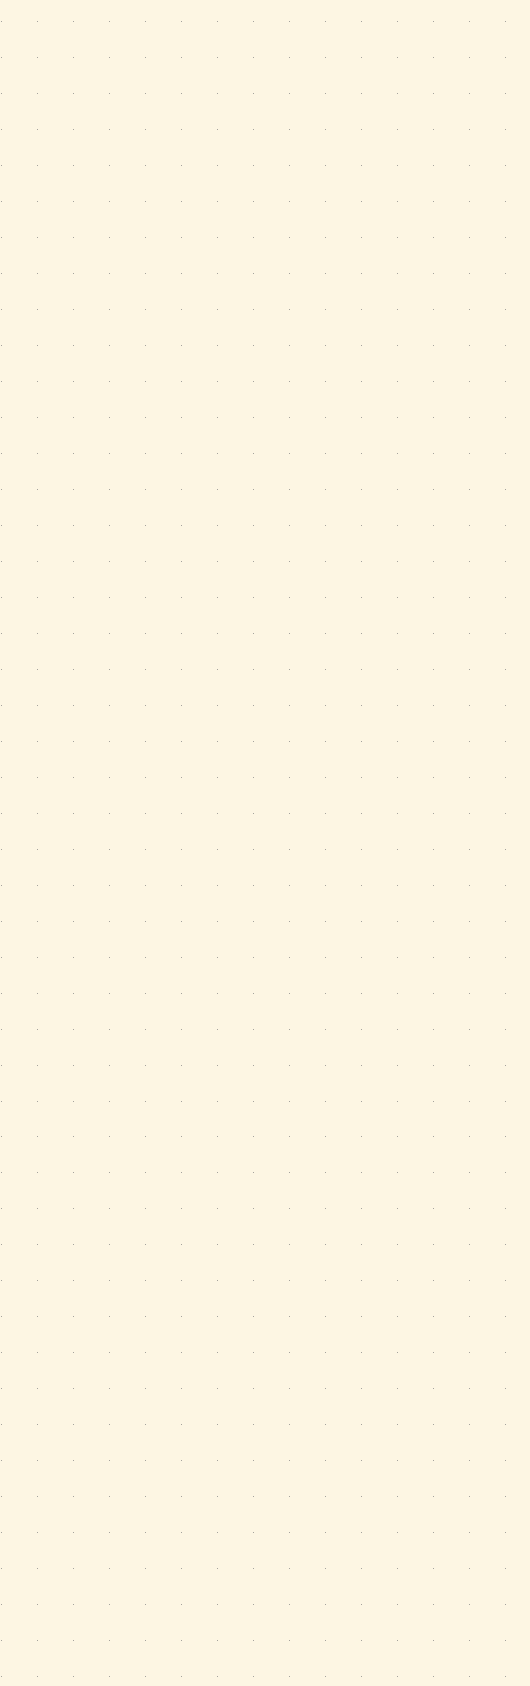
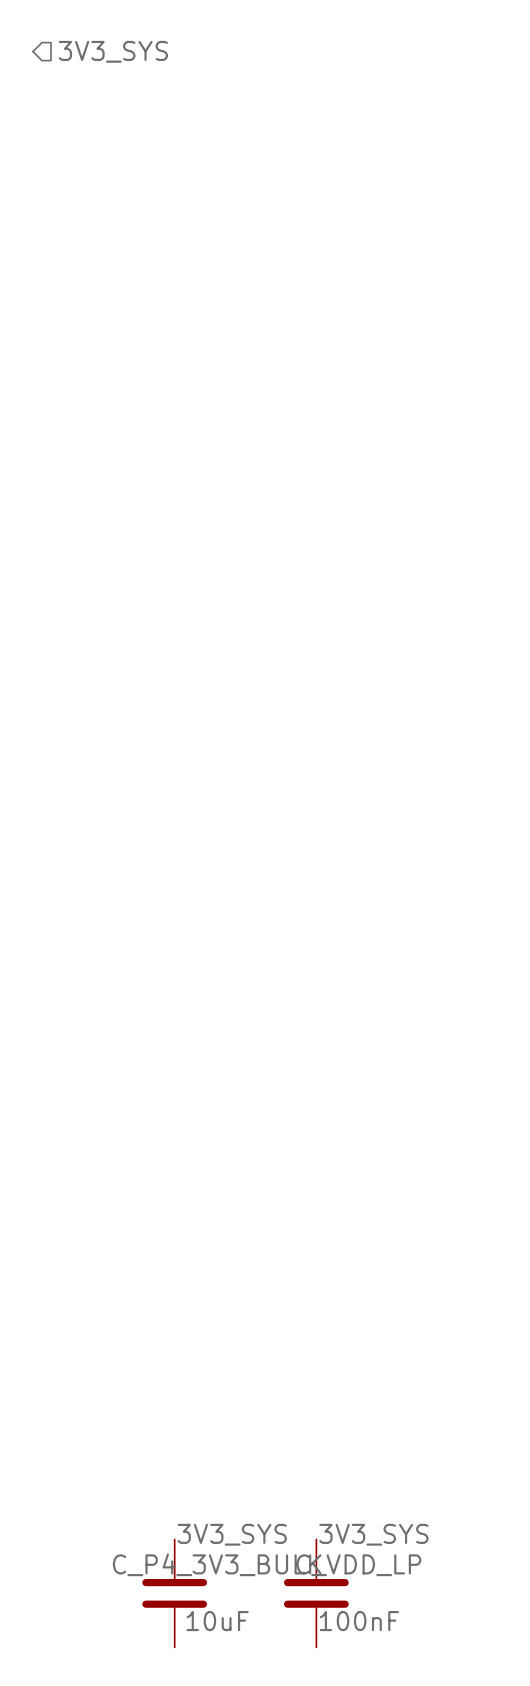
hierarchical label: none -> 3V3_SYS (113, 51)
label: none -> 3V3_SYS (232, 1534)
label: none -> 3V3_SYS (373, 1534)
C_P4_3V3_BULK: none -> 10uF (174, 1593)
C_VDD_LP: none -> 100nF (316, 1593)

